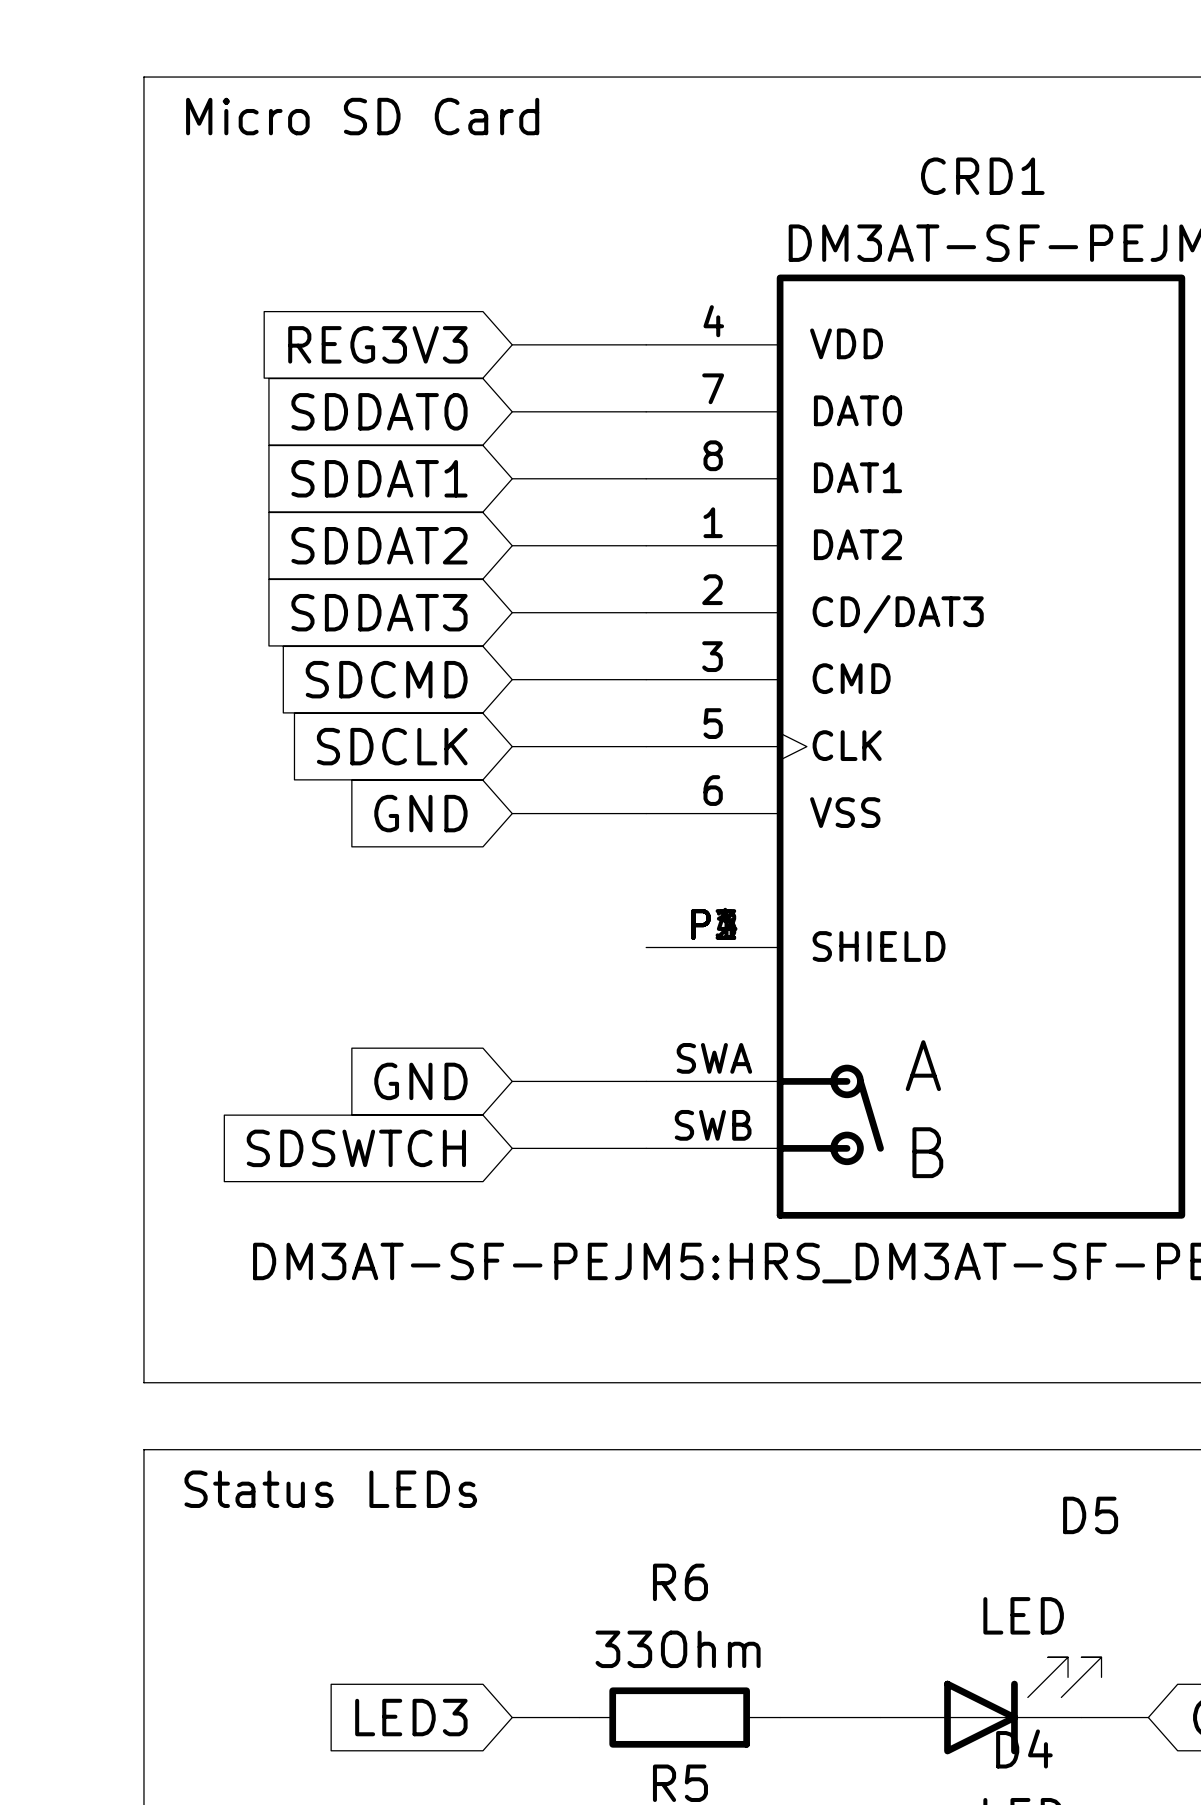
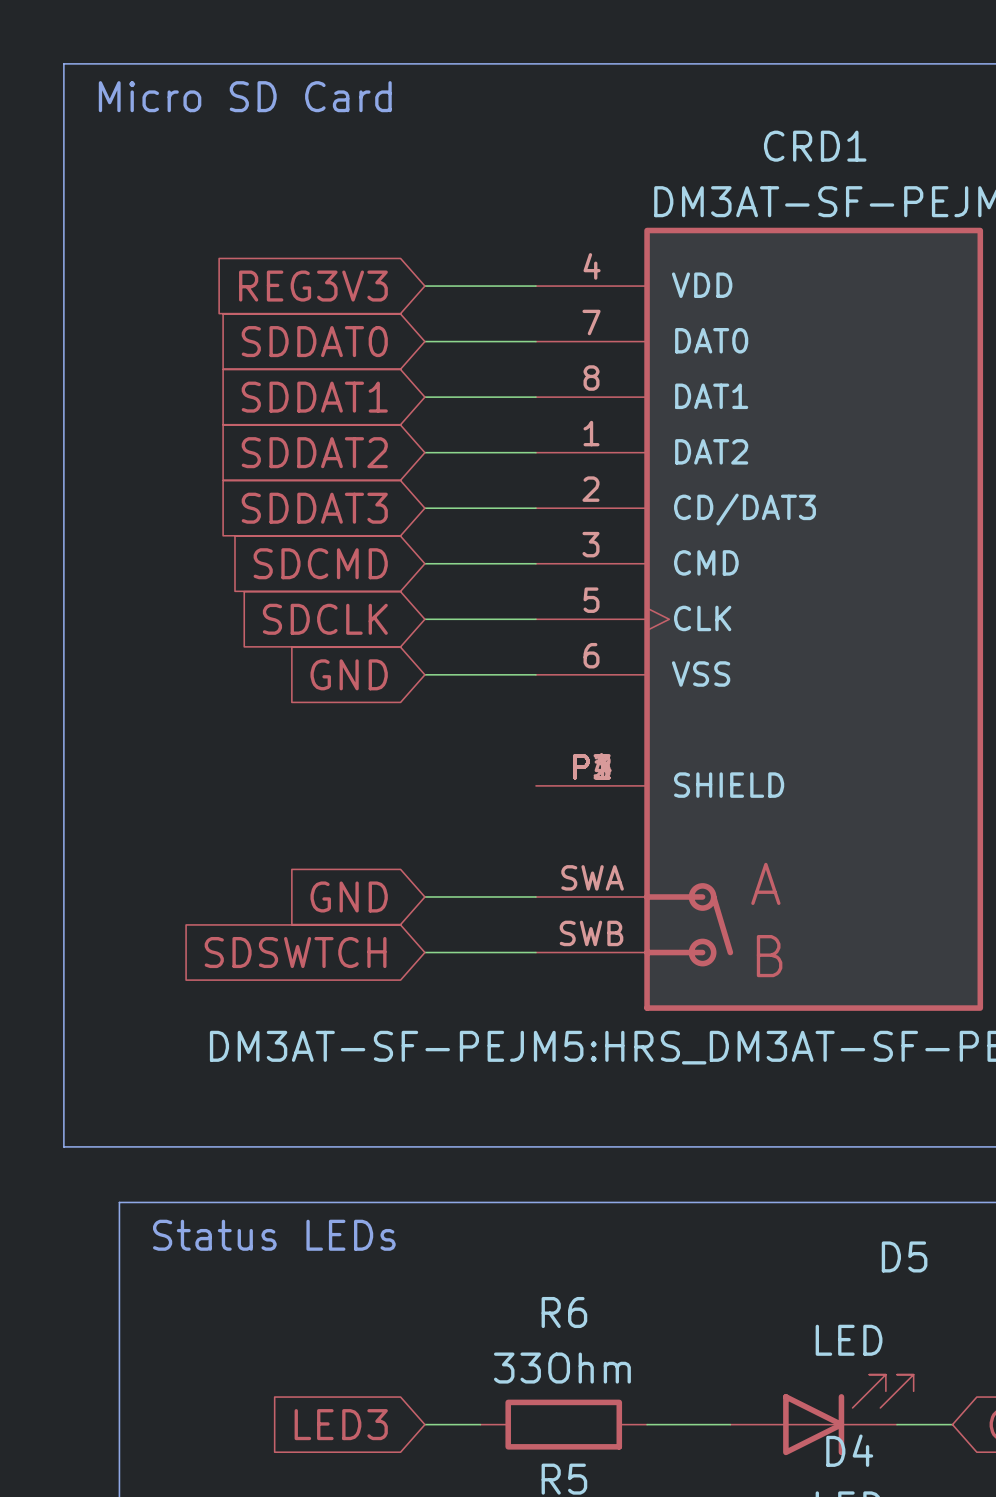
line: (143, 77) (143, 1382) -> (119, 63) (63, 63) (63, 1146) (119, 1146)
text position: Micro SD Card (362, 116) -> Micro SD Card (245, 96)

